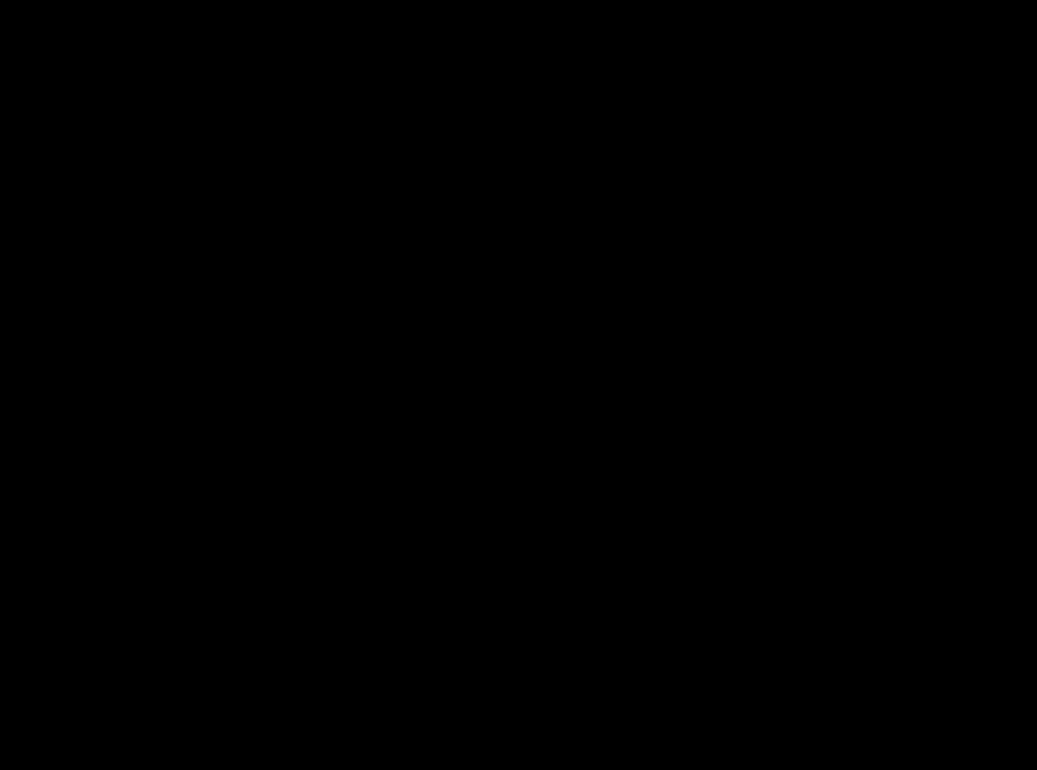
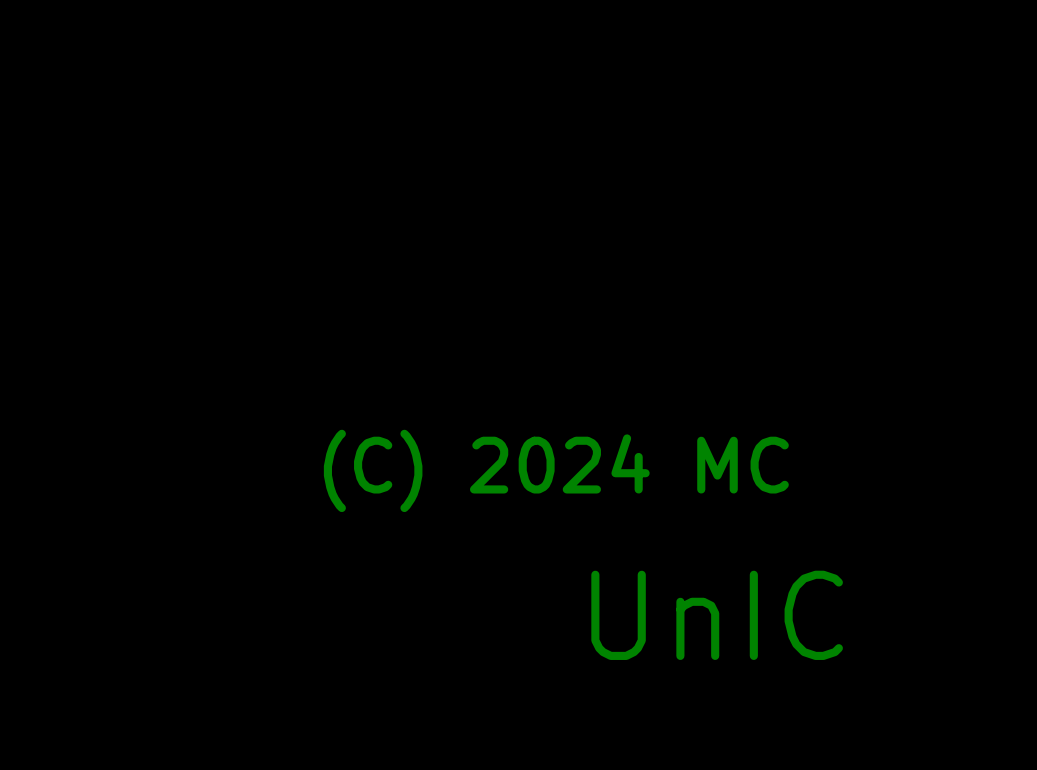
text: none -> (C) 2024 MC (556, 470)
text: none -> UnIC (717, 615)

